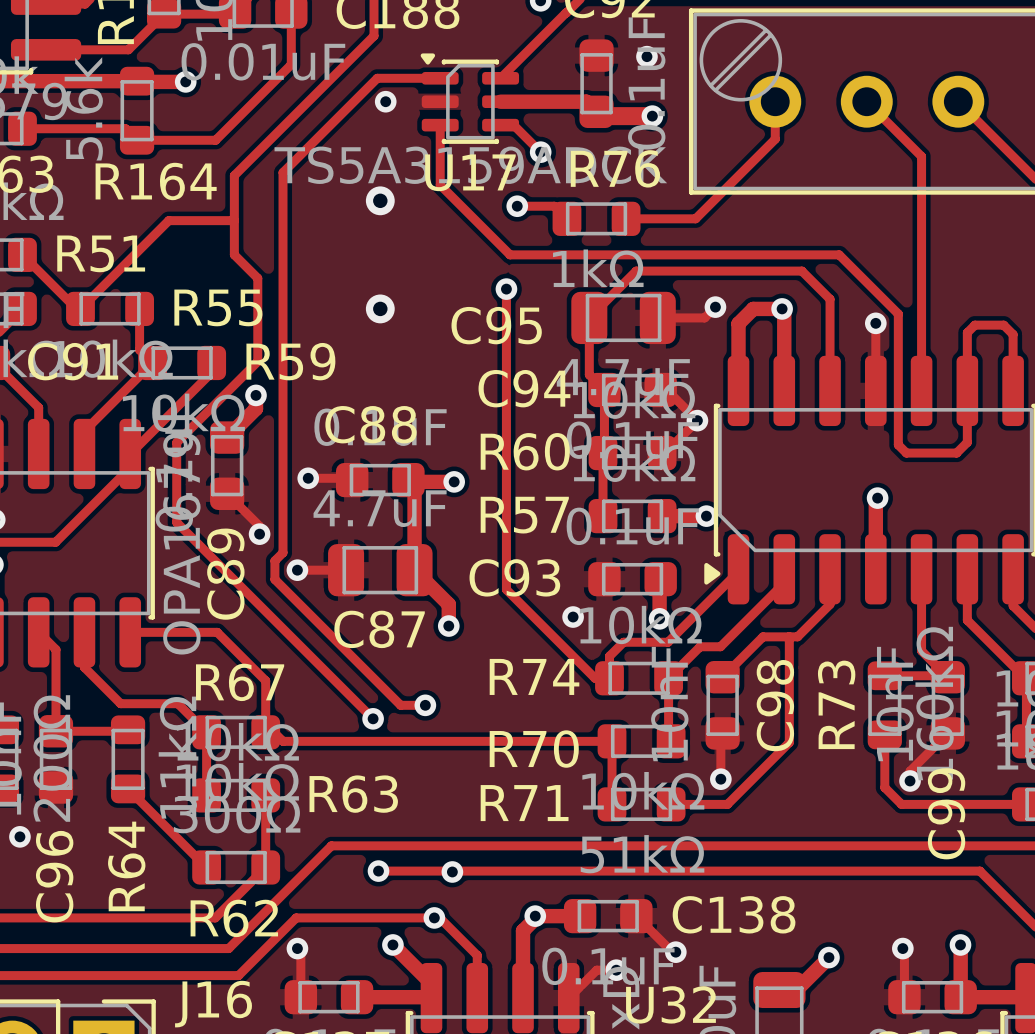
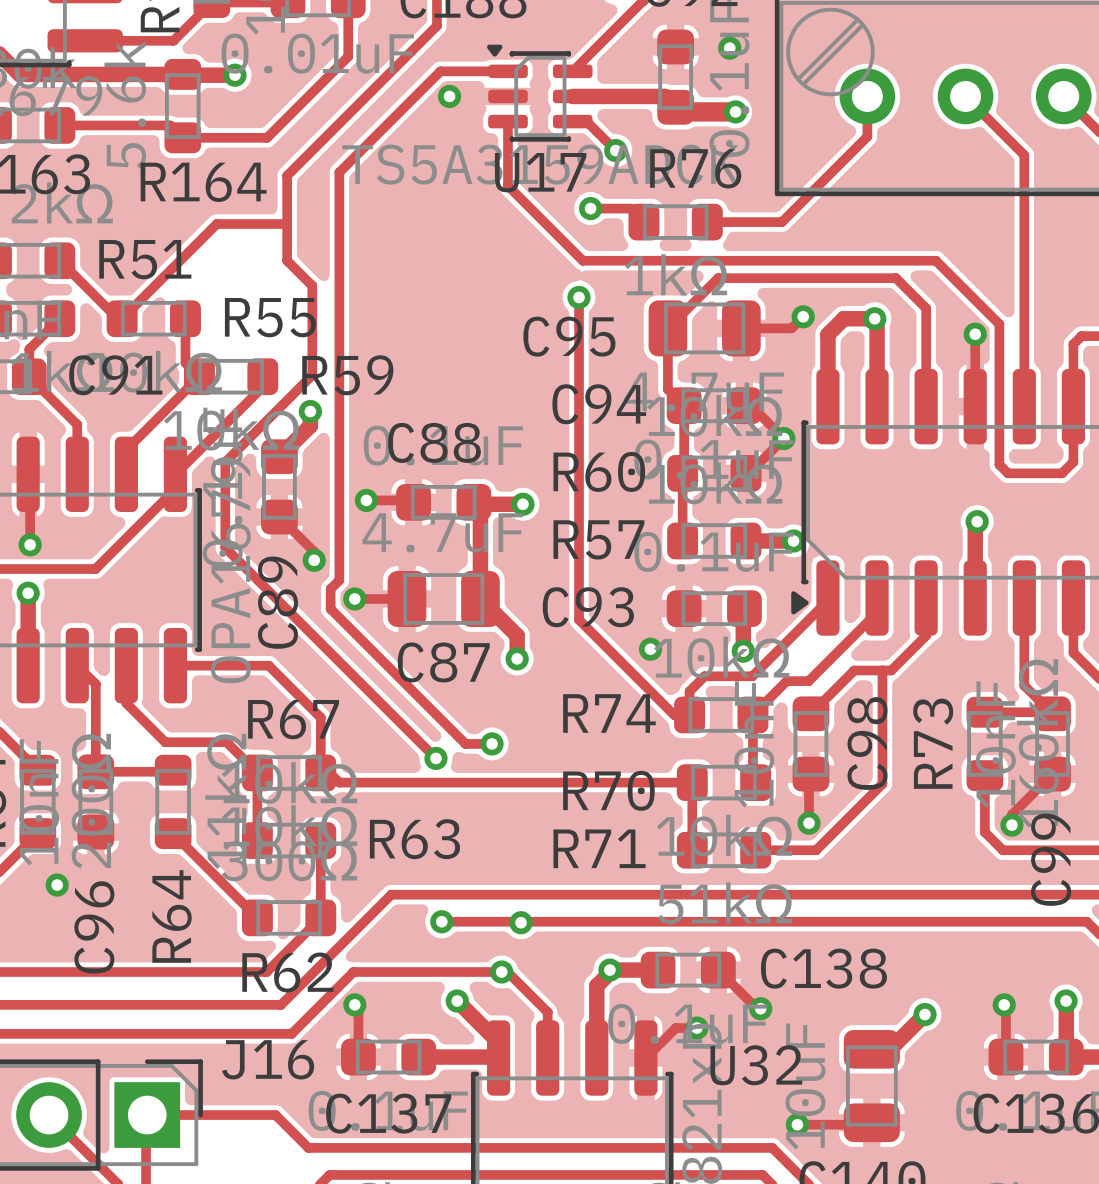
via: (380, 200) -> none
via: (380, 308) -> none

